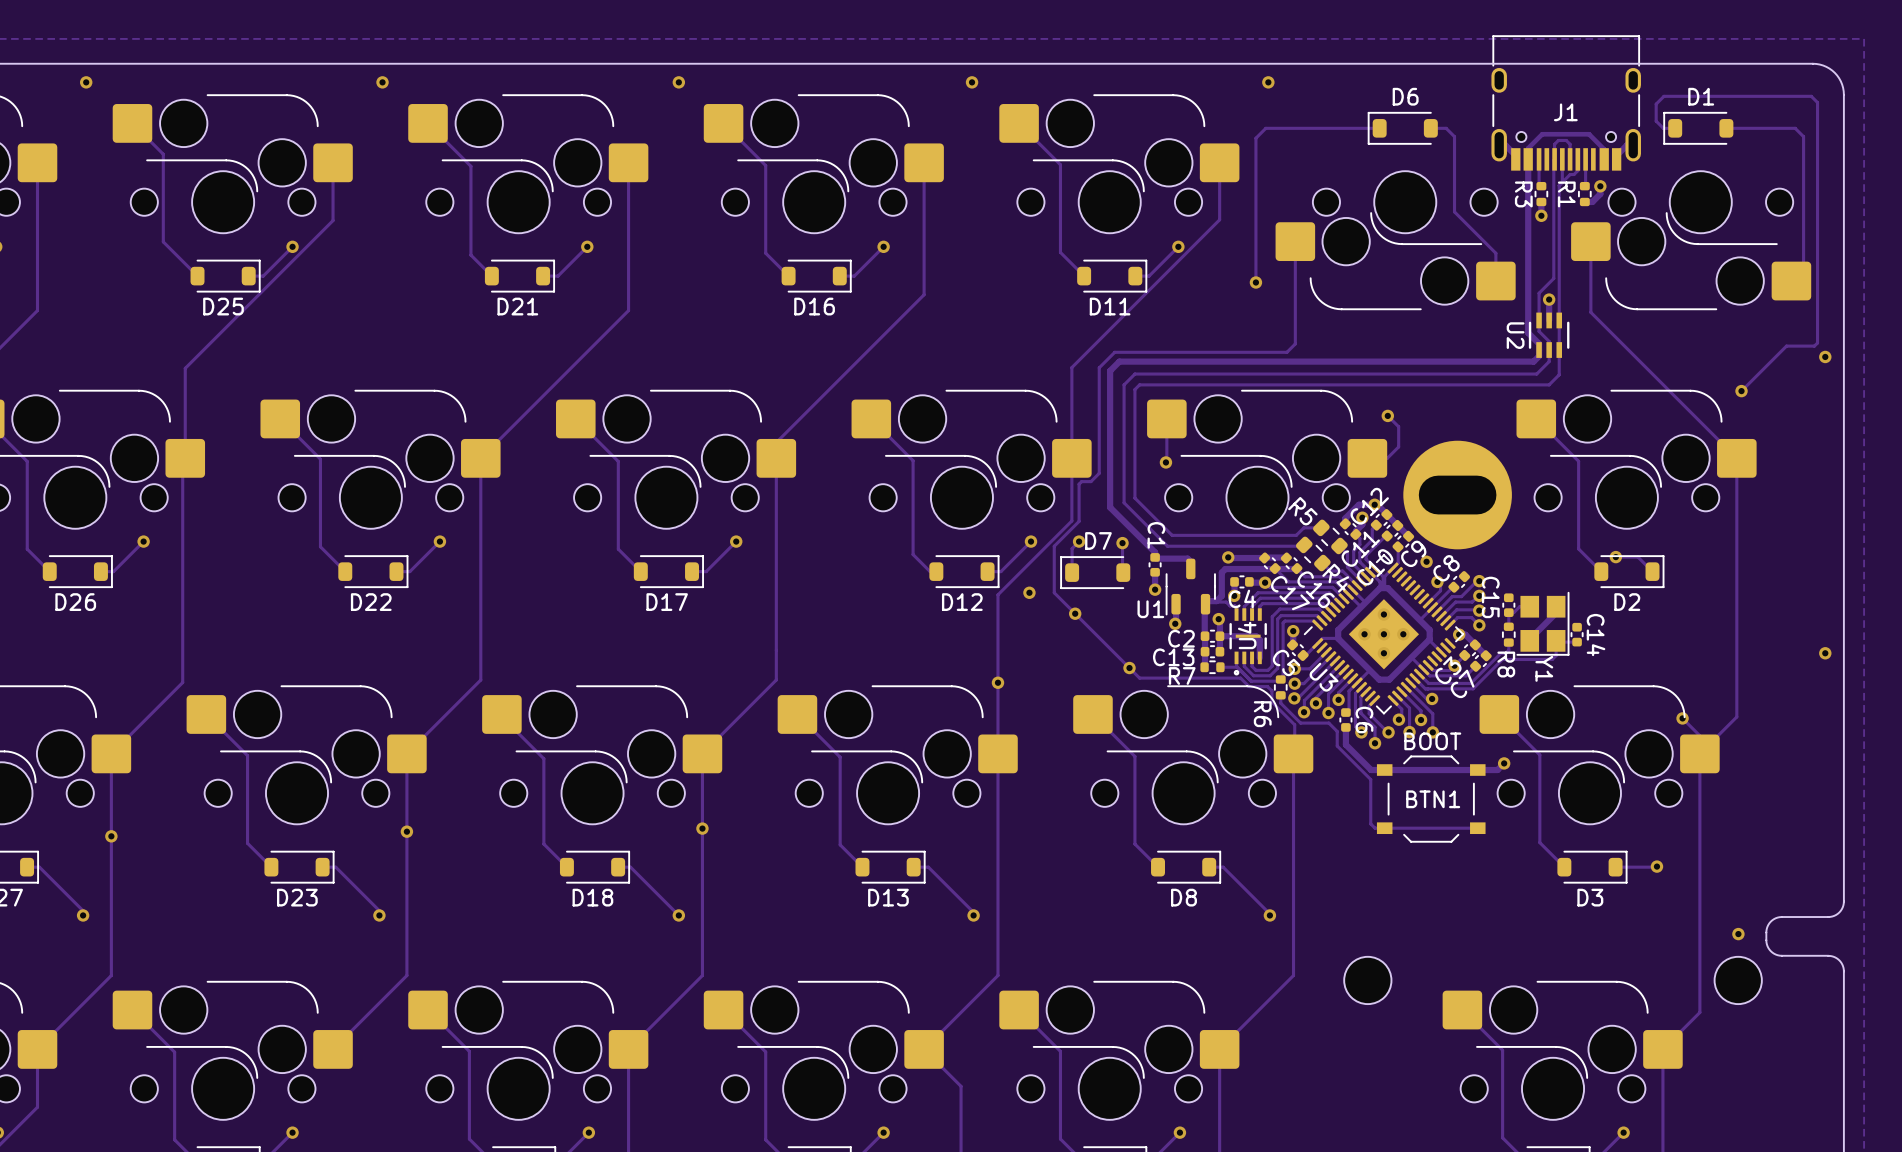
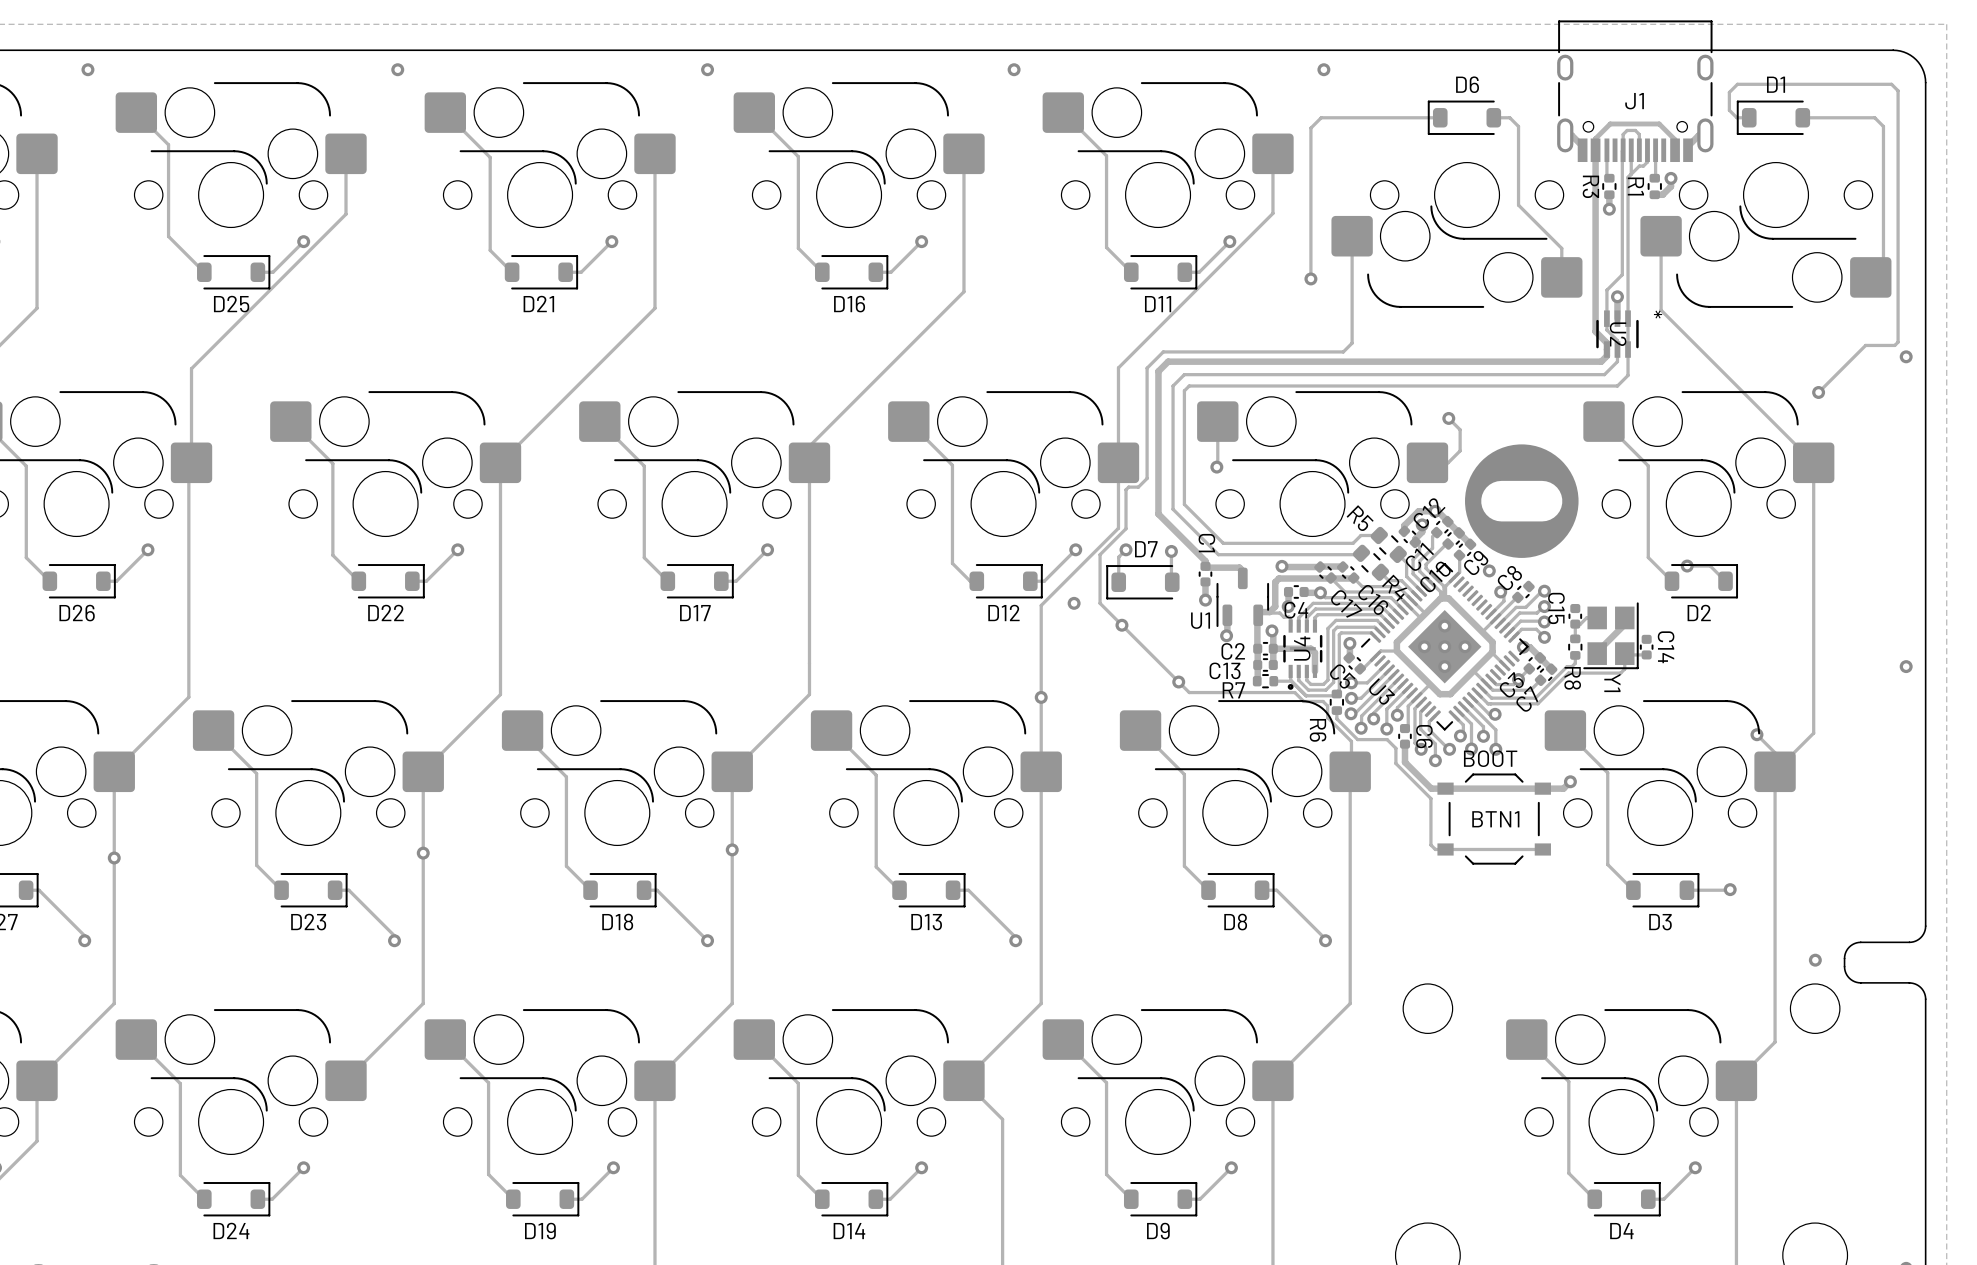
U2 text: none -> * (1658, 314)
U2 name position: U2 (1515, 335) -> U2 (1618, 334)

